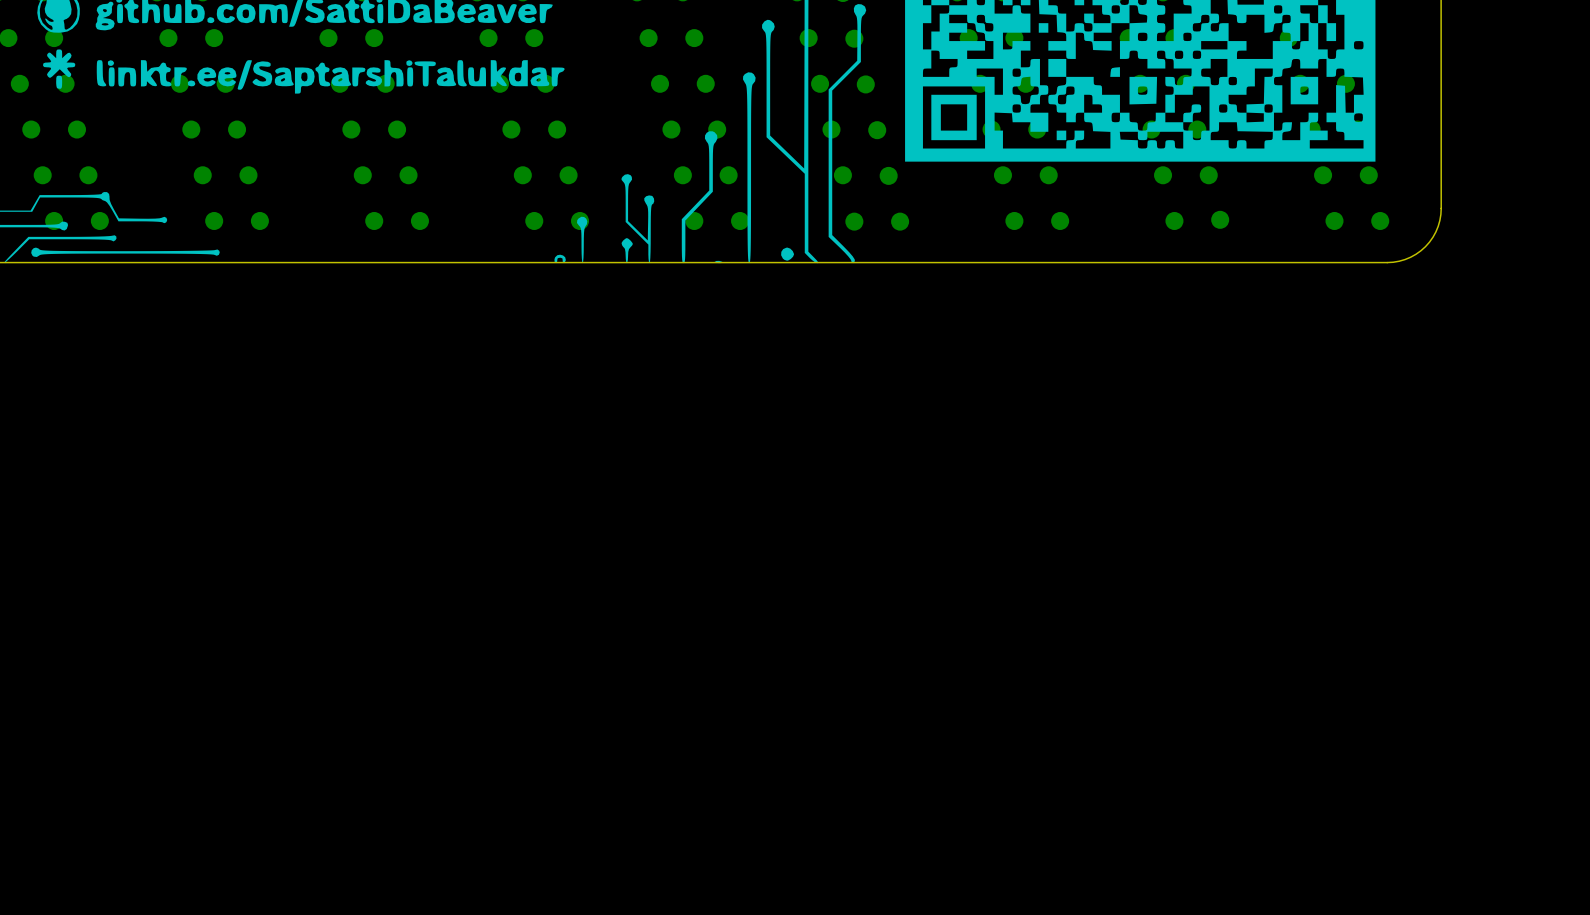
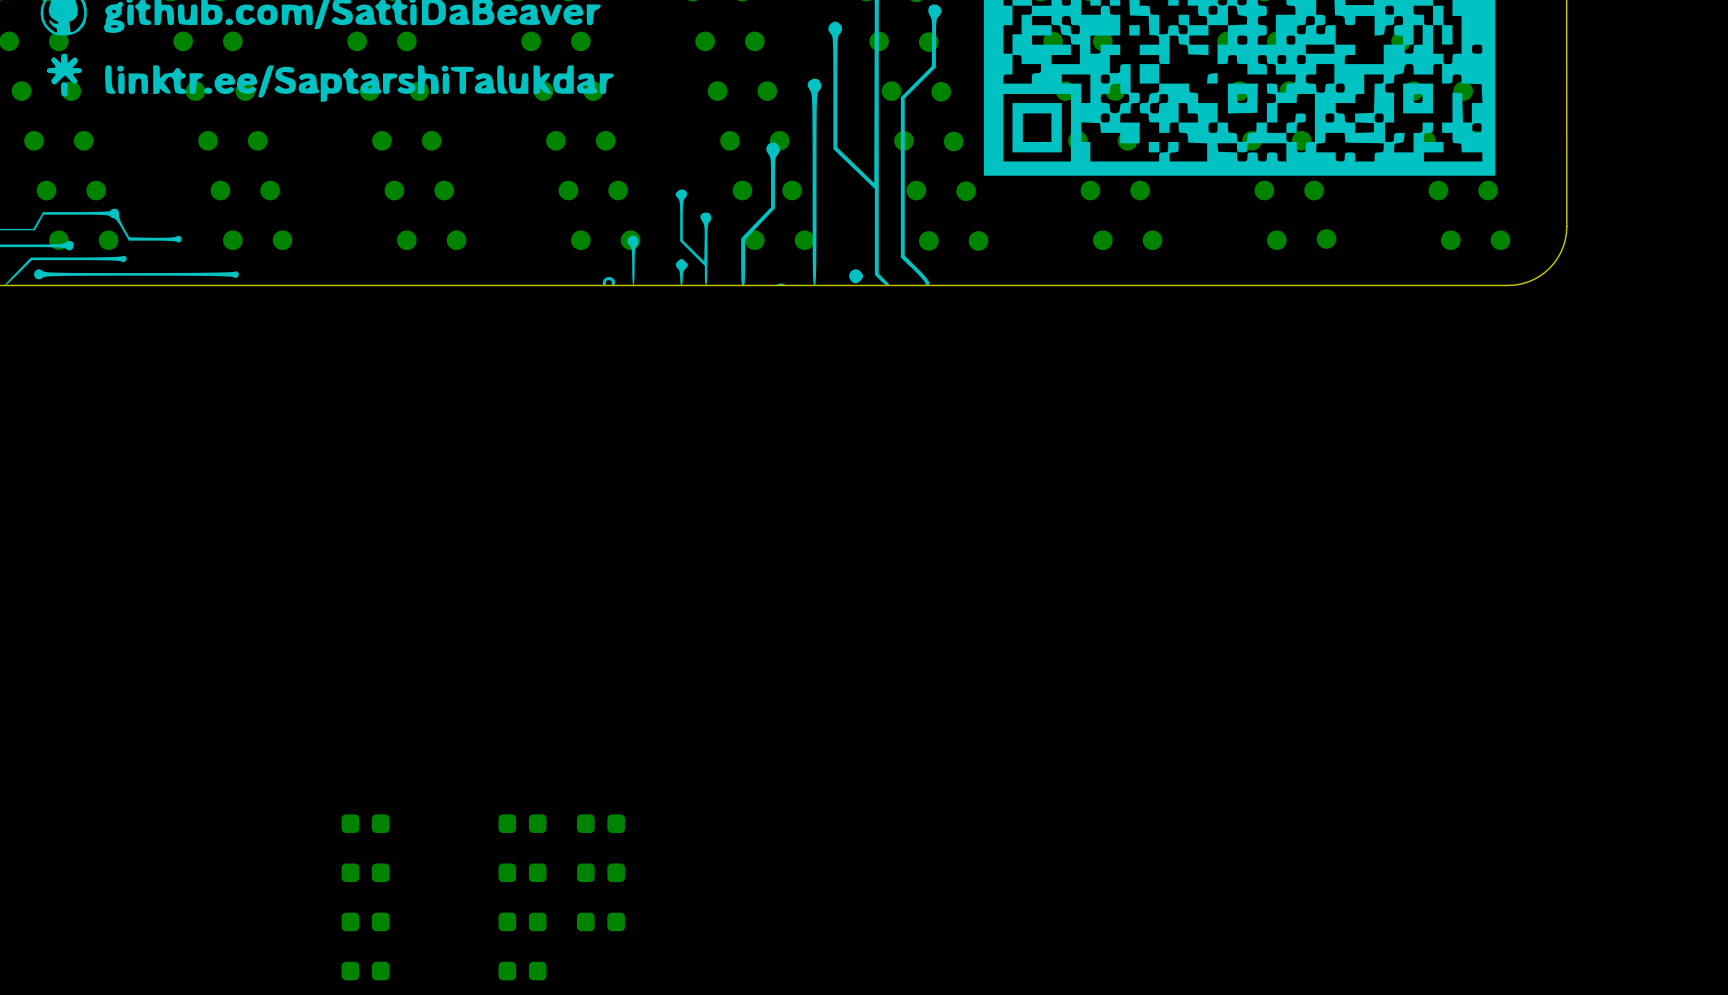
part: none -> (365, 823)
part: none -> (522, 823)
part: none -> (600, 823)
part: none -> (365, 872)
part: none -> (522, 872)
part: none -> (600, 872)
part: none -> (365, 921)
part: none -> (522, 921)
part: none -> (600, 921)
part: none -> (365, 971)
part: none -> (522, 971)

